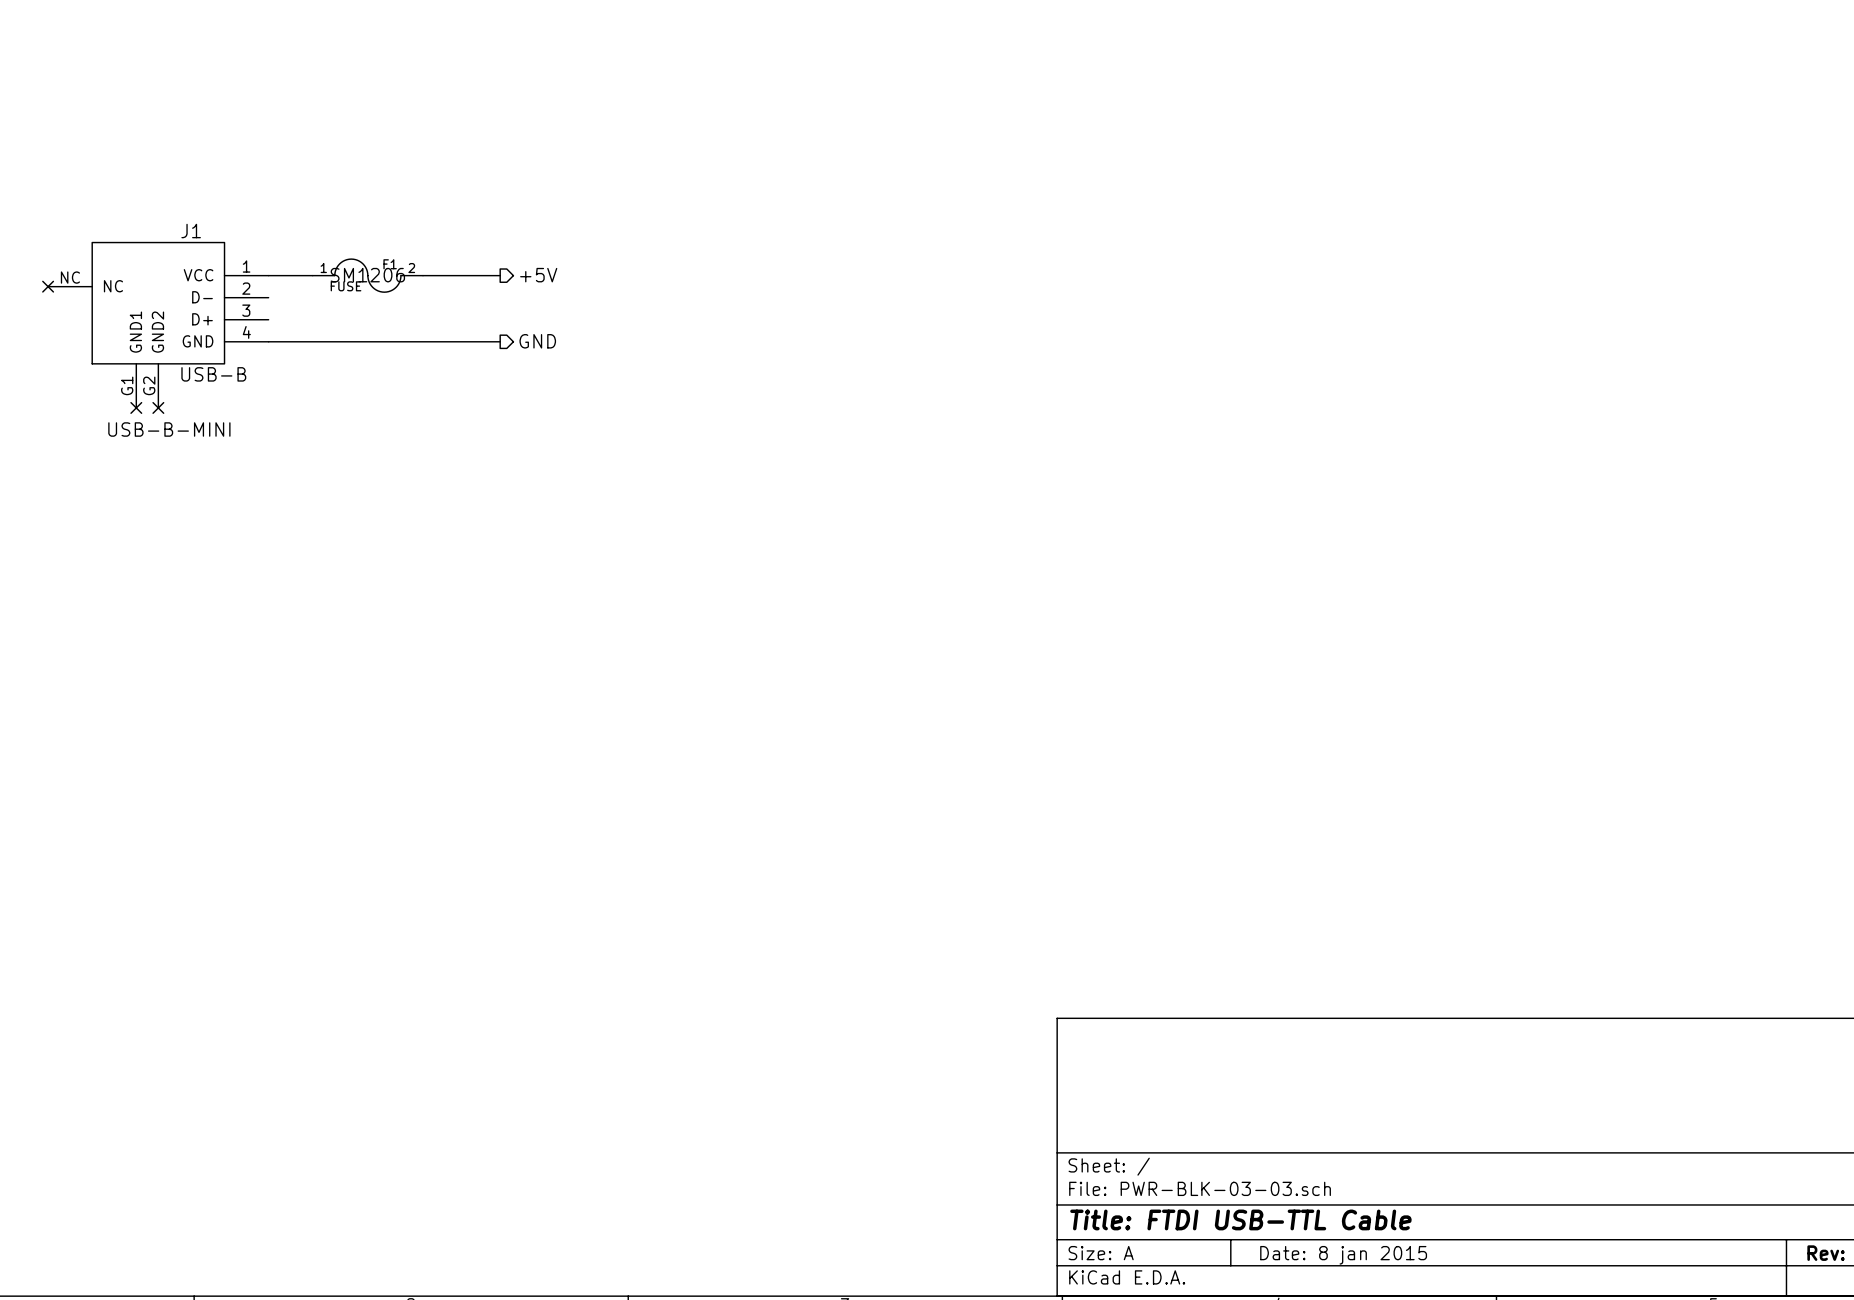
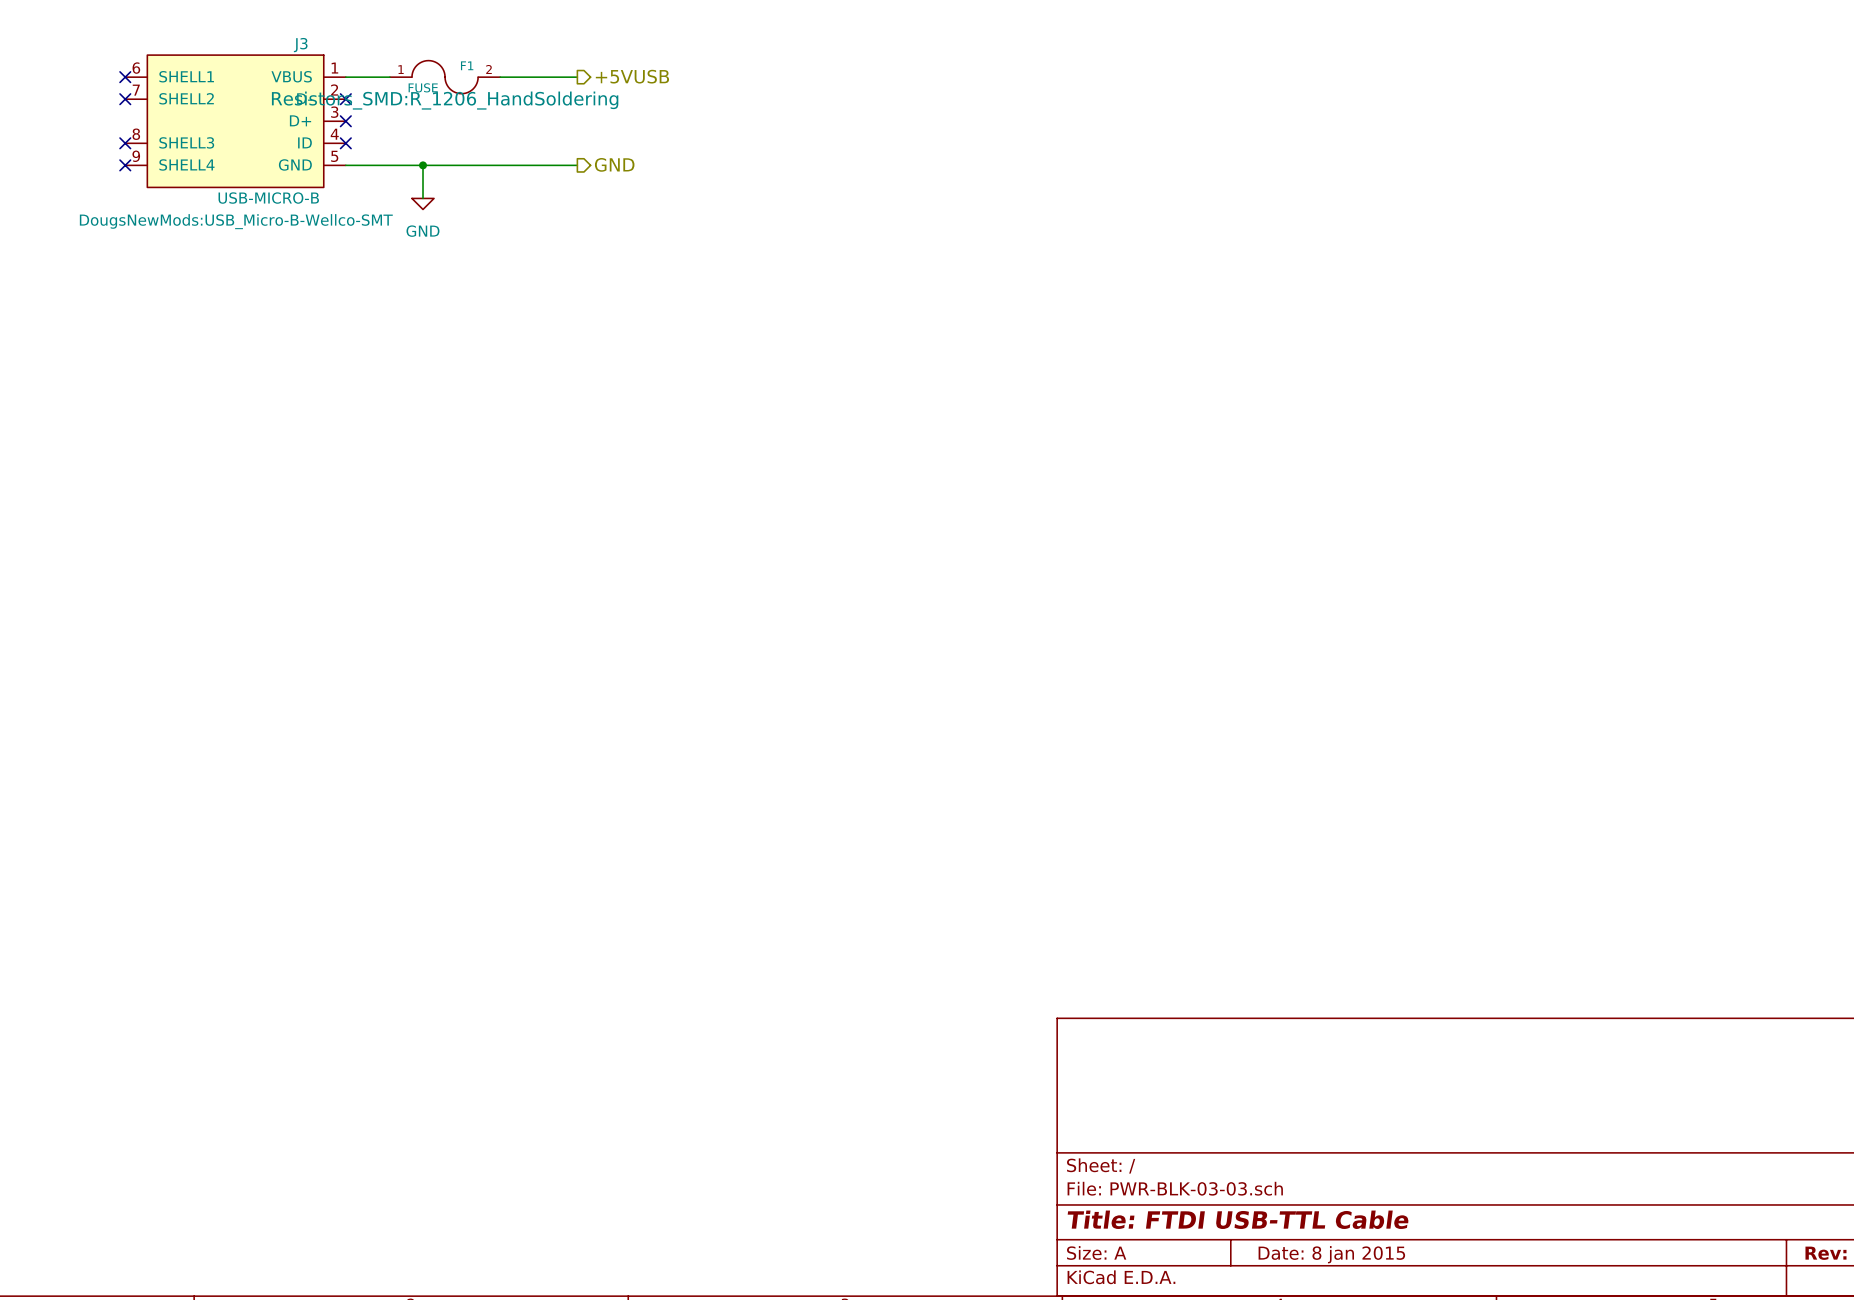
hierarchical label: none -> +5VUSB (632, 76)
no-connect mark: none -> (125, 77)
no-connect mark: none -> (125, 99)
no-connect mark: none -> (345, 99)
J3: none -> USB-MICRO-B (235, 121)
no-connect mark: none -> (345, 121)
no-connect mark: none -> (125, 143)
no-connect mark: none -> (345, 143)
no-connect mark: none -> (125, 165)
wire: none -> (423, 165) (423, 198)
junction: none -> (423, 165)
power symbol: none -> GND (423, 203)
wire: (268, 275) (312, 275) -> (345, 77) (389, 77)
F1 position: (367, 275) -> (445, 77)
F1 text: SM1206 (367, 275) -> Resistors_SMD:R_1206_HandSoldering (445, 100)
wire: (423, 275) (500, 275) -> (500, 77) (577, 77)
hierarchical label: +5V (538, 275) -> none
no-connect mark: (48, 286) -> none
J1: USB-B (158, 325) -> none
wire: (268, 341) (500, 341) -> (345, 165) (577, 165)
hierarchical label position: GND (537, 341) -> GND (614, 164)
no-connect mark: (136, 407) -> none
no-connect mark: (158, 407) -> none

